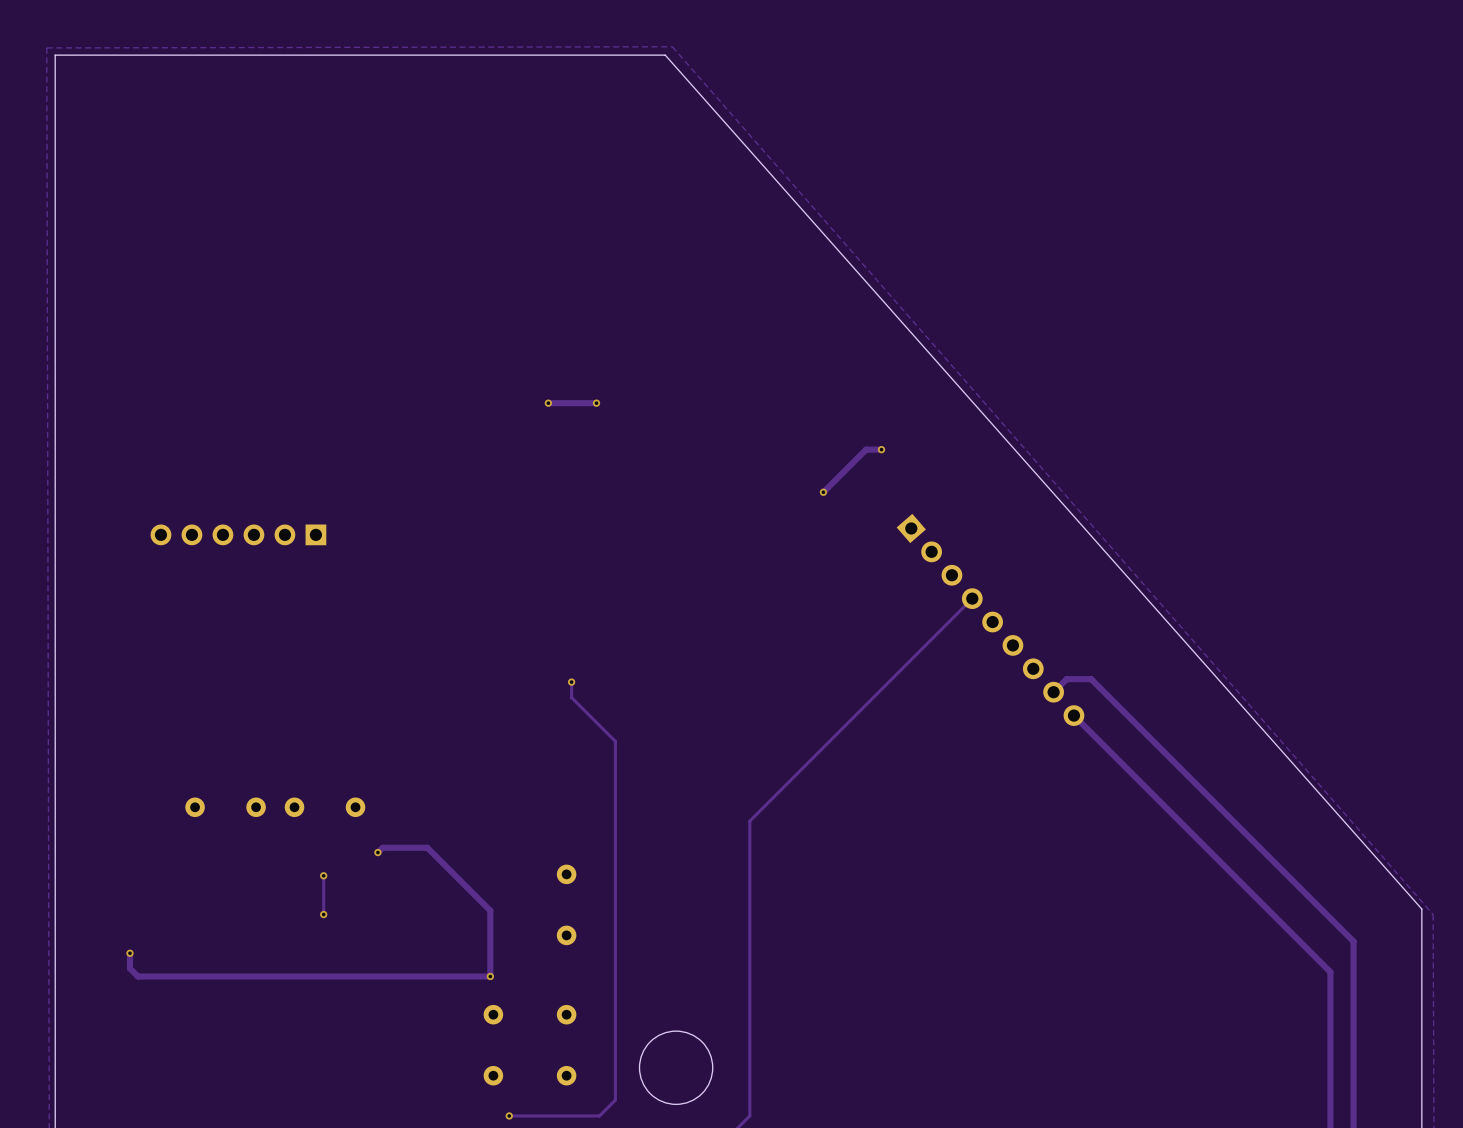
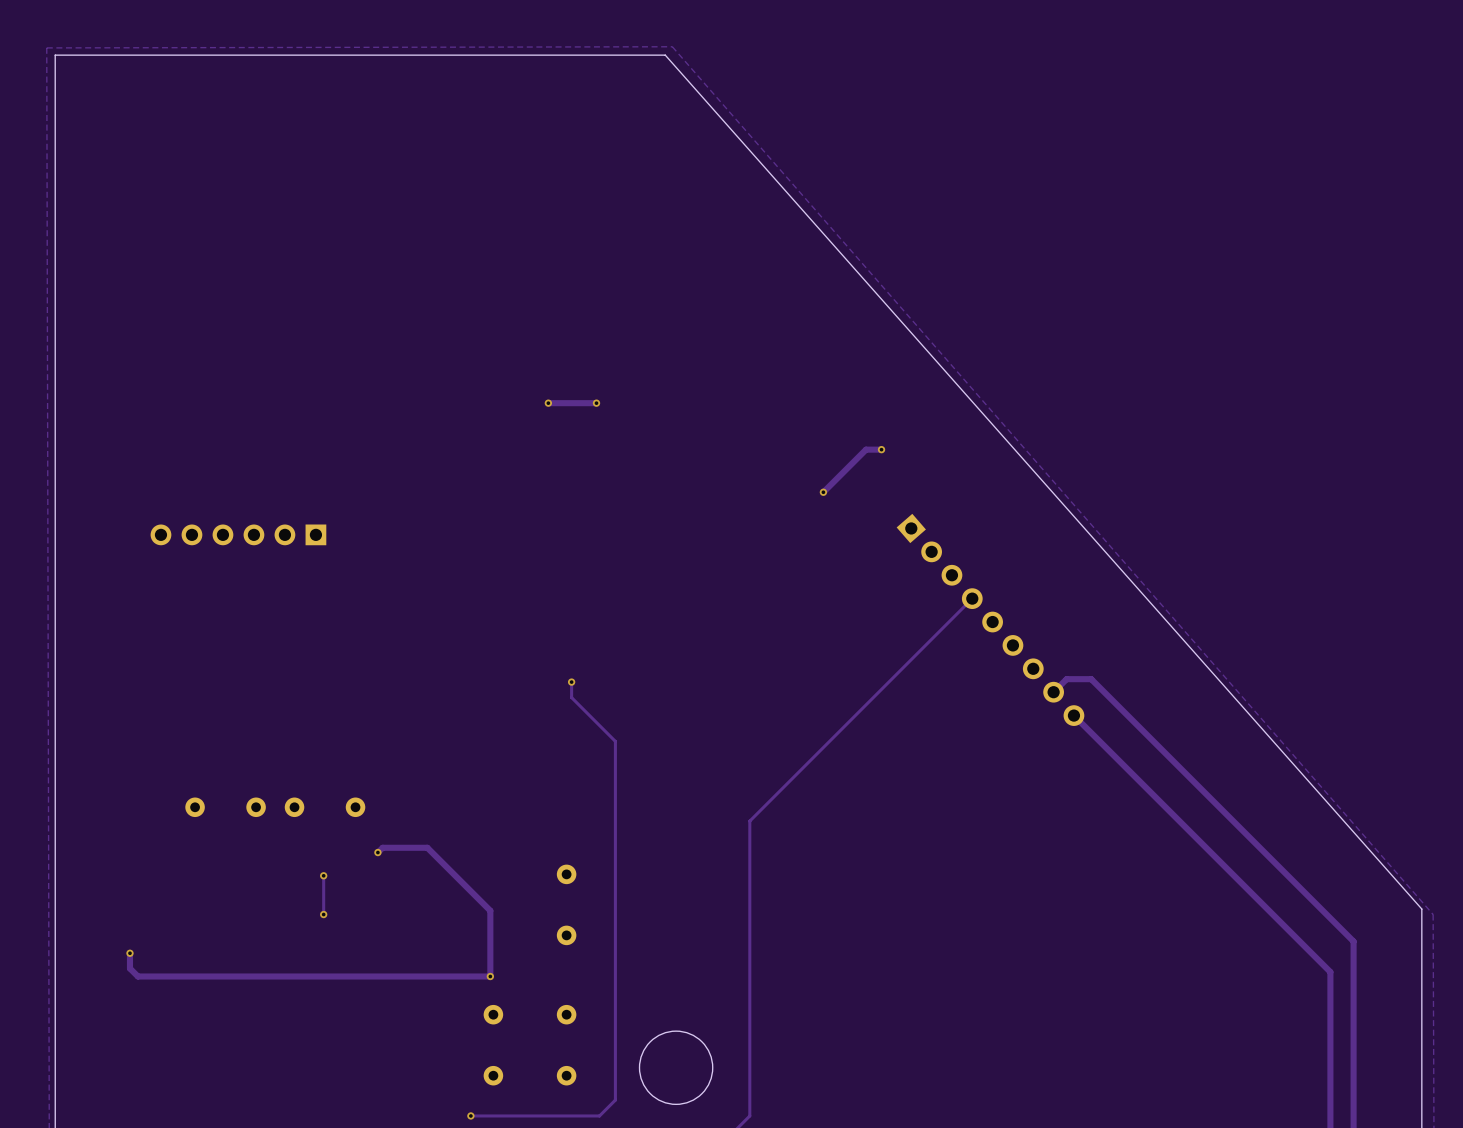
via: none -> (470, 1115)
track: none -> (509, 1115) (470, 1115)
via: (509, 1115) -> none

